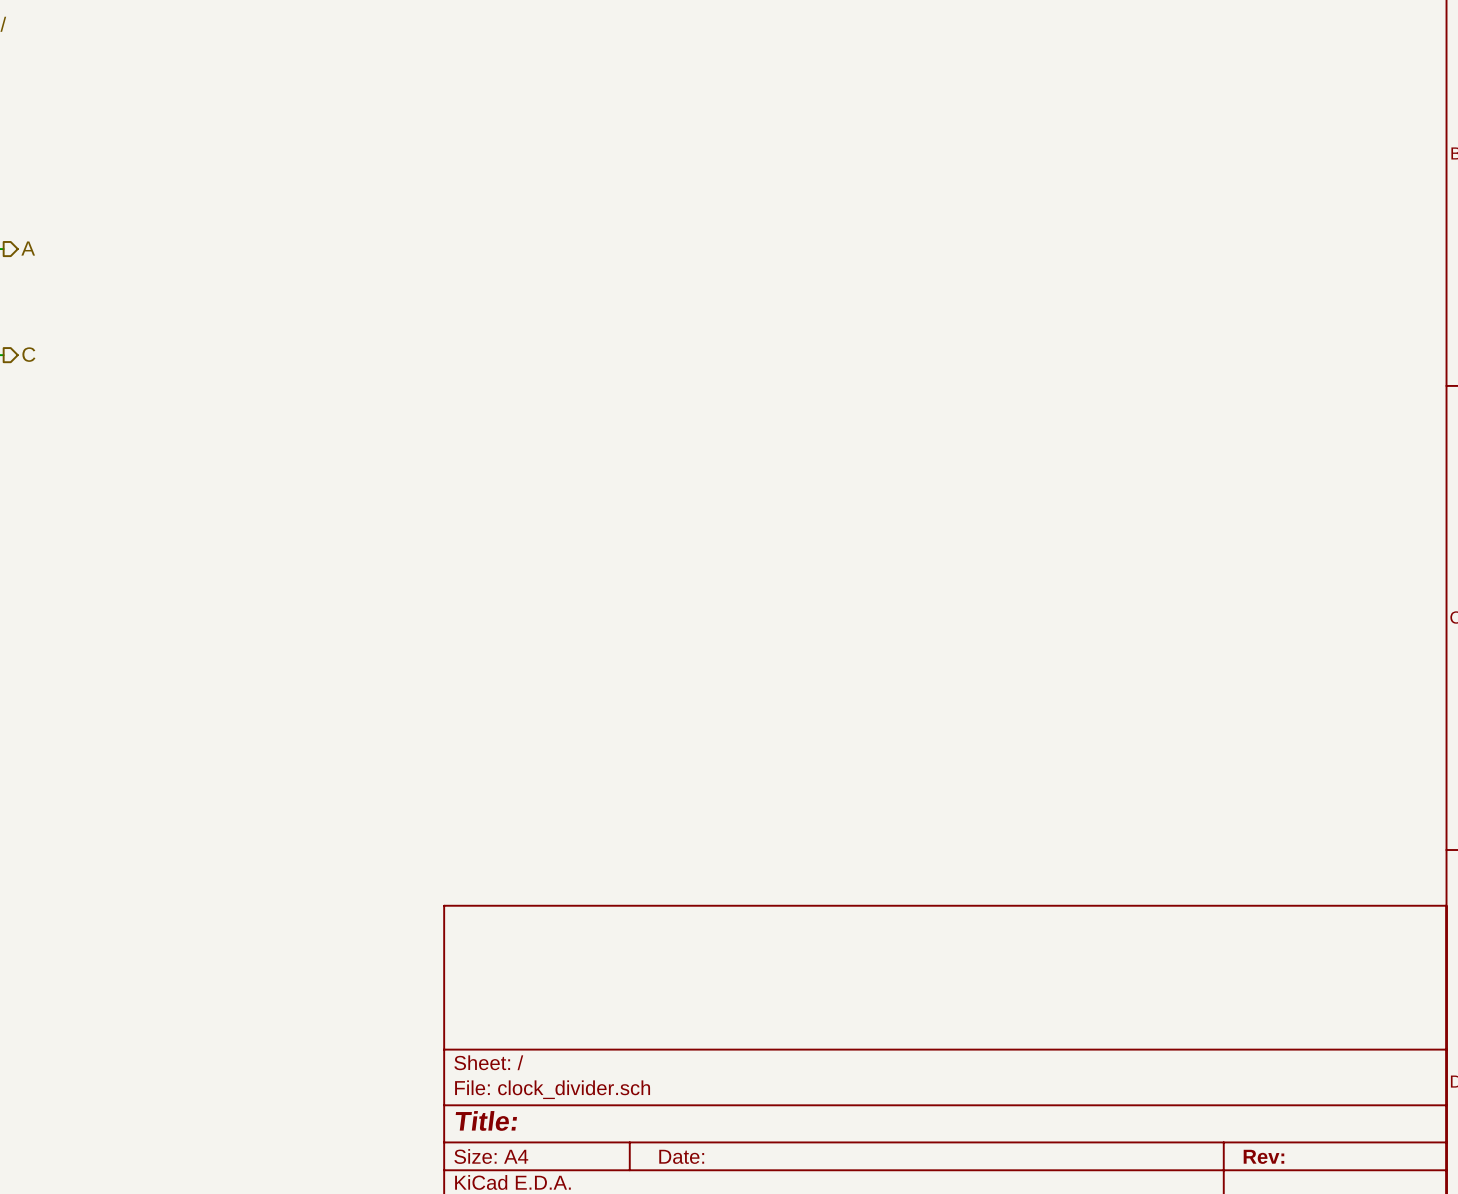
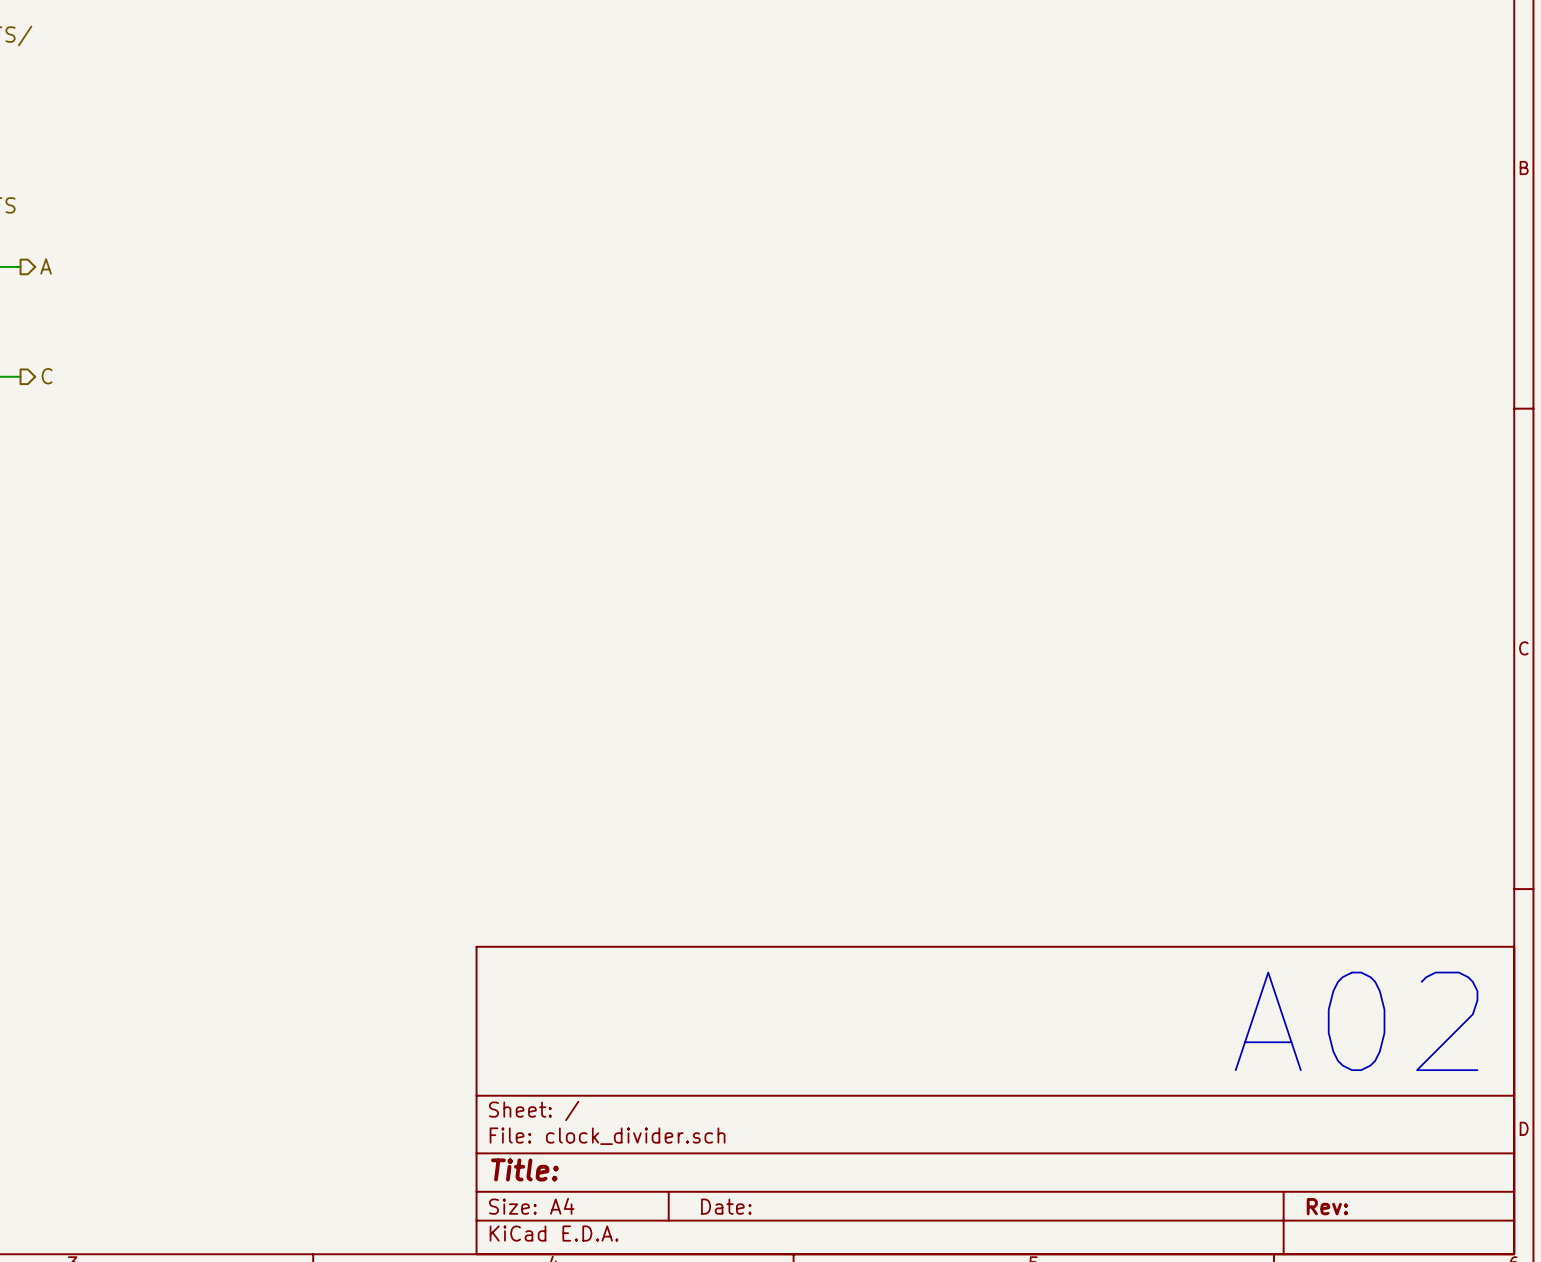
text: none -> A02 (1356, 1021)

